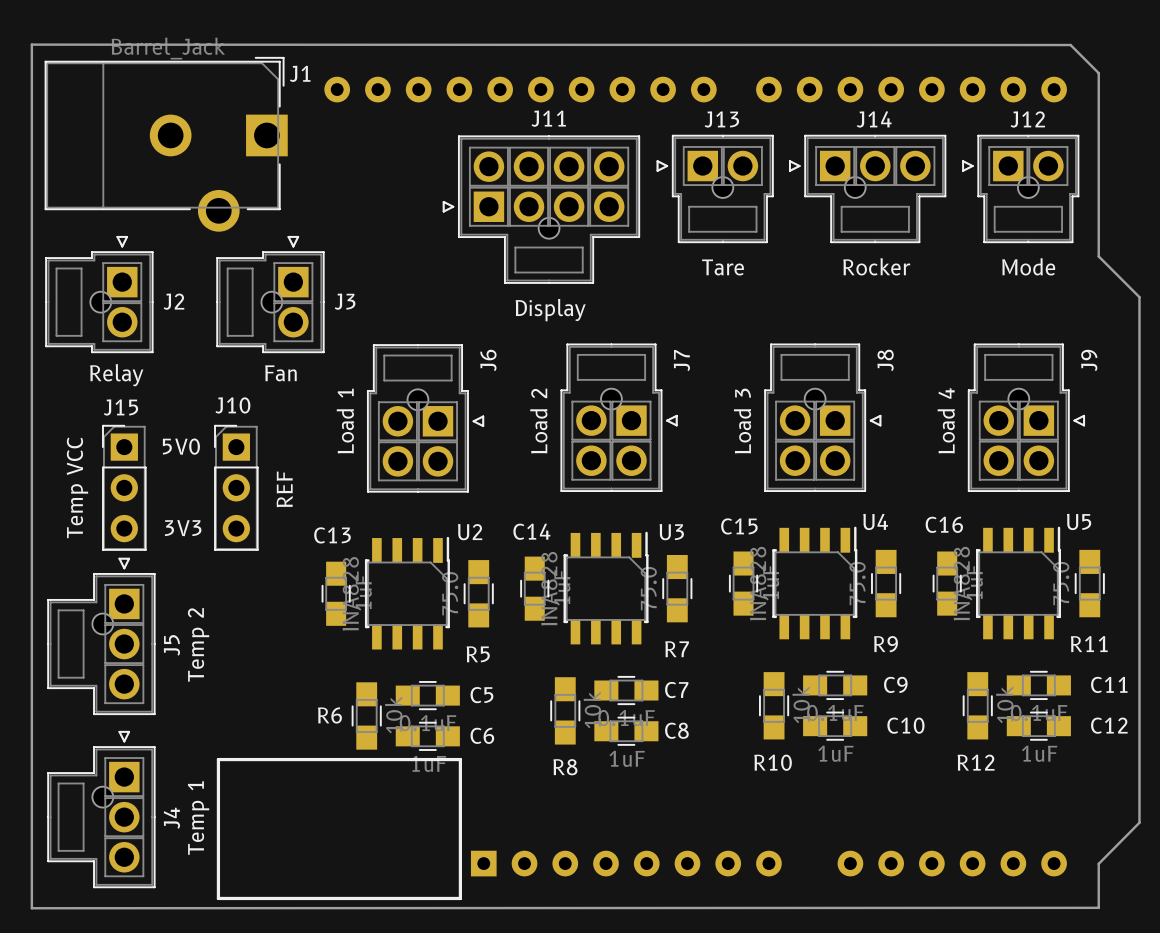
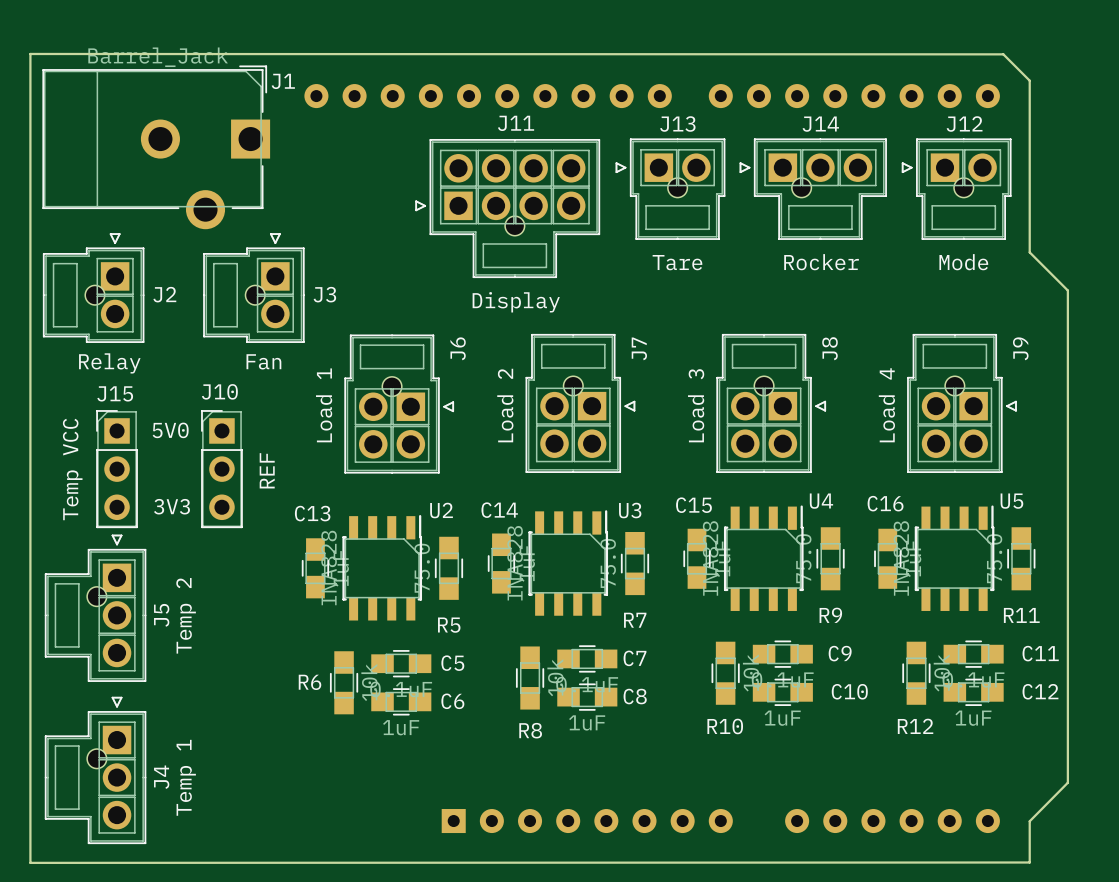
line: (218, 759) (460, 759) (460, 898) (218, 898) (218, 759) -> none

